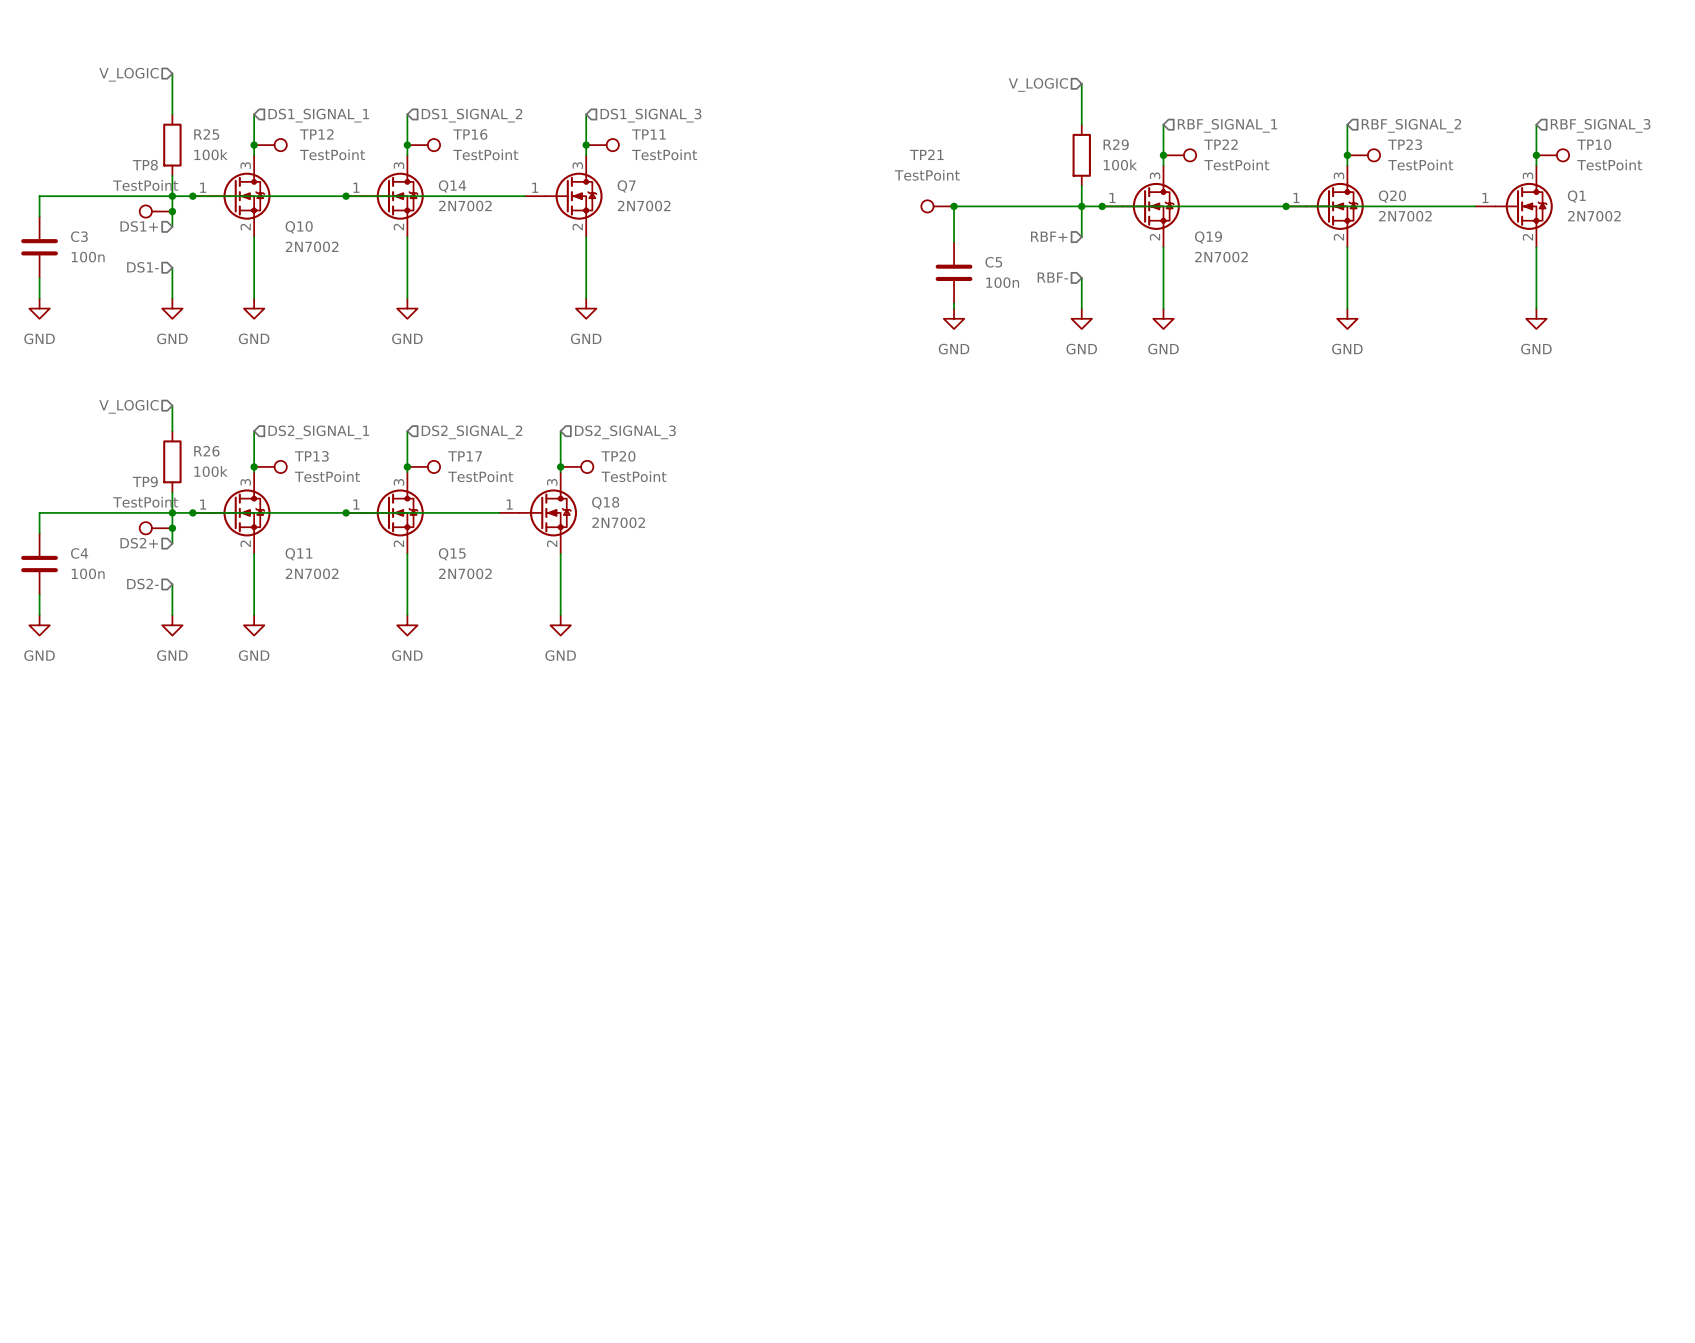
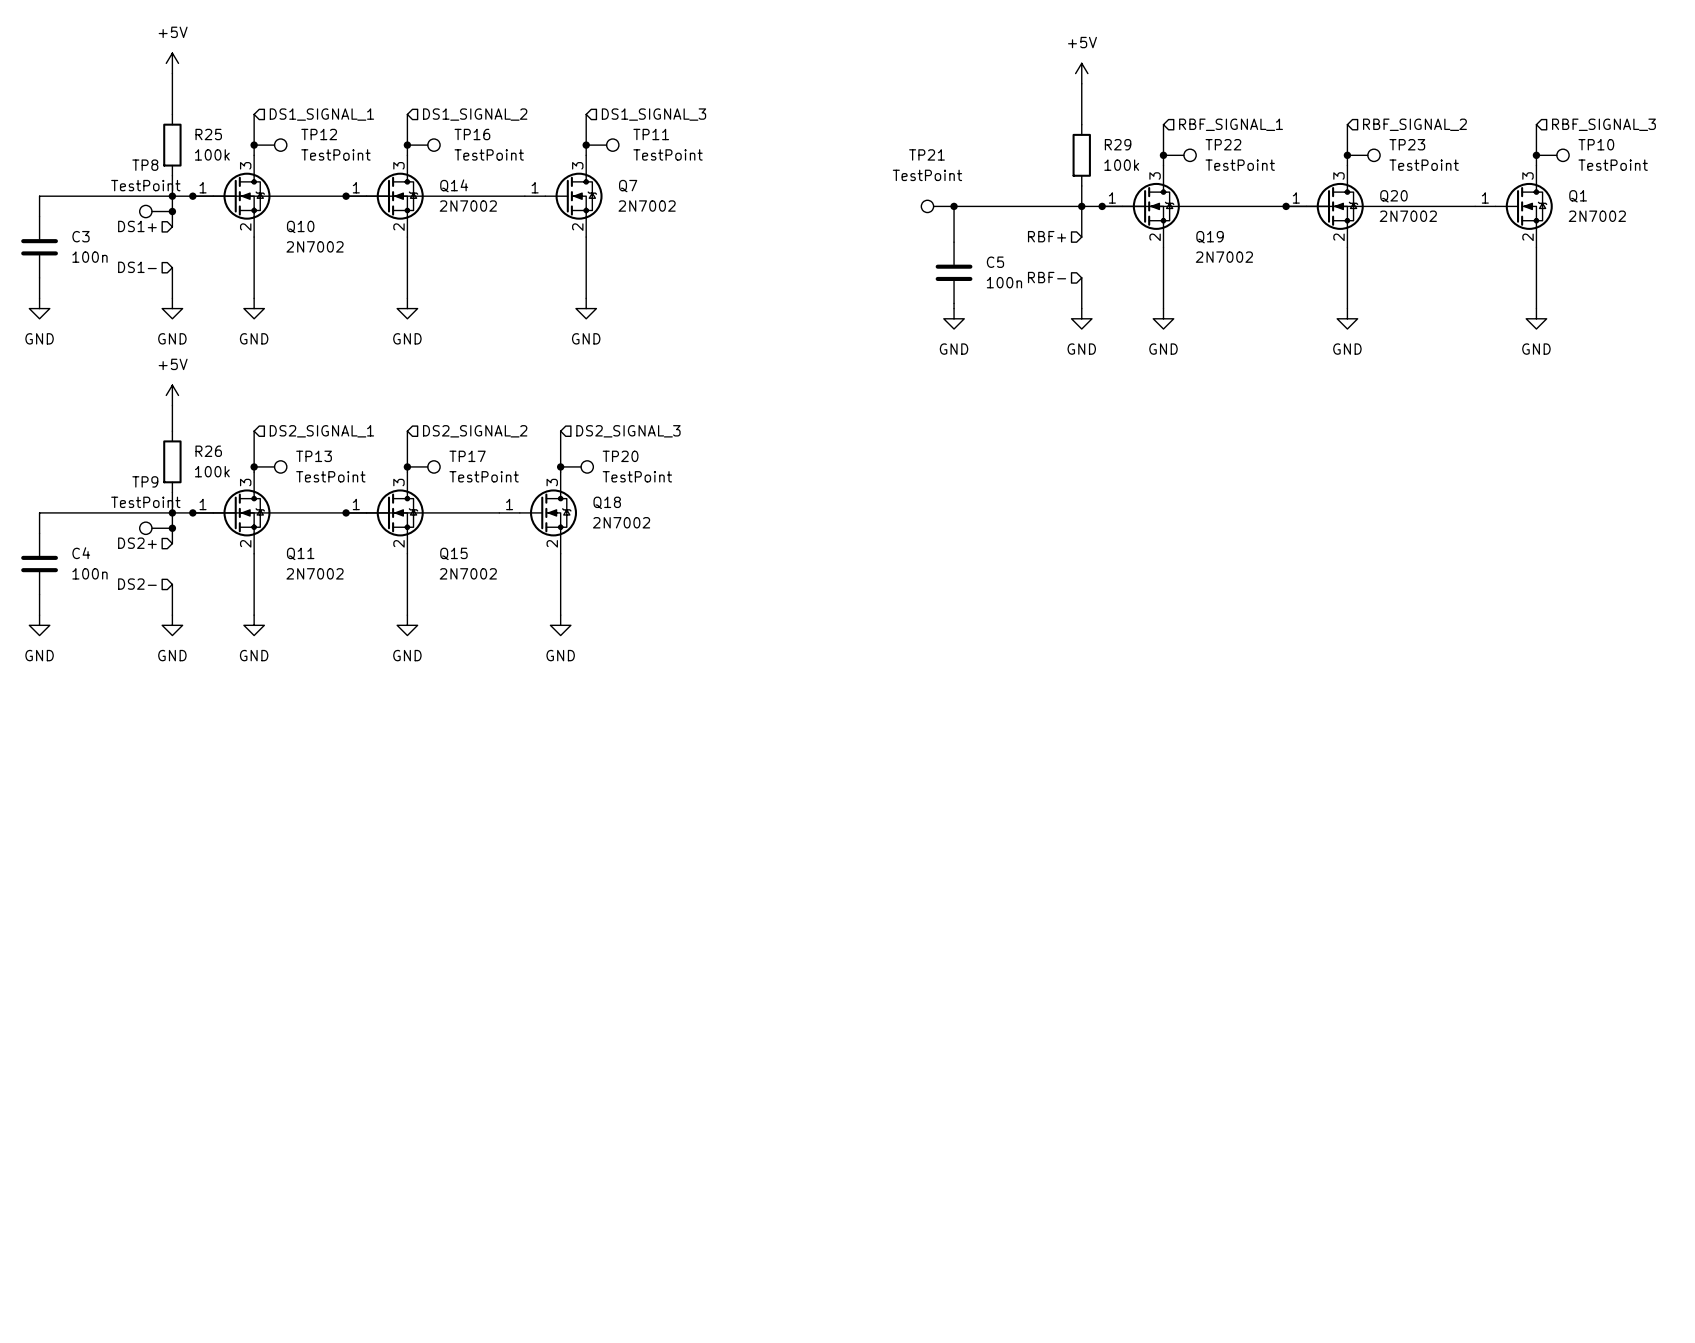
power symbol: none -> +5V (172, 63)
power symbol: none -> +5V (1081, 73)
hierarchical label: V_LOGIC (128, 74) -> none
hierarchical label: V_LOGIC (1038, 84) -> none
power symbol: none -> +5V (172, 395)
hierarchical label: V_LOGIC (128, 406) -> none

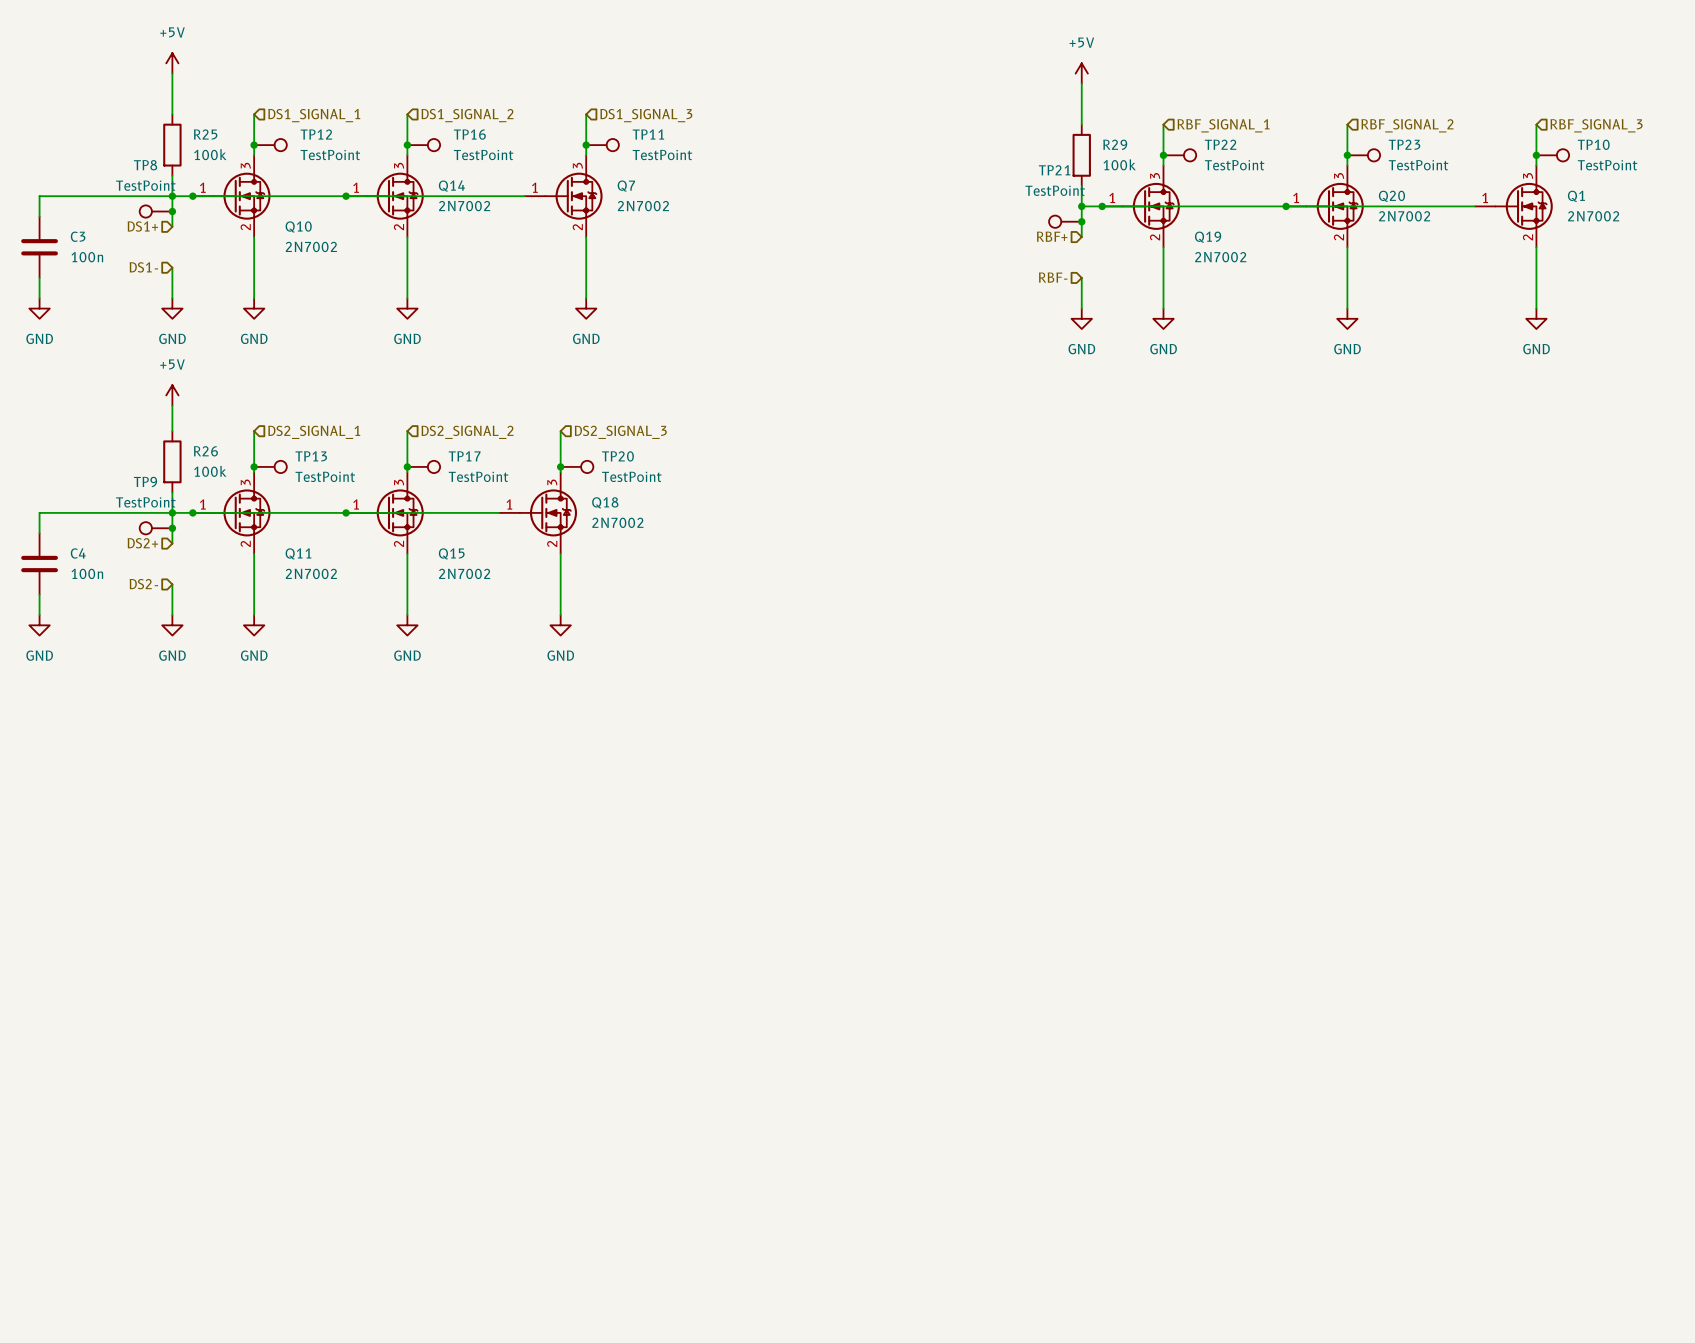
TP21 position: (937, 206) -> (1065, 221)
junction: (954, 206) -> none
wire: (1081, 206) (954, 206) (954, 242) -> none
junction: none -> (1081, 221)
C5: 100n (954, 272) -> none
wire: (954, 303) (954, 308) -> none
power symbol: GND (954, 318) -> none

